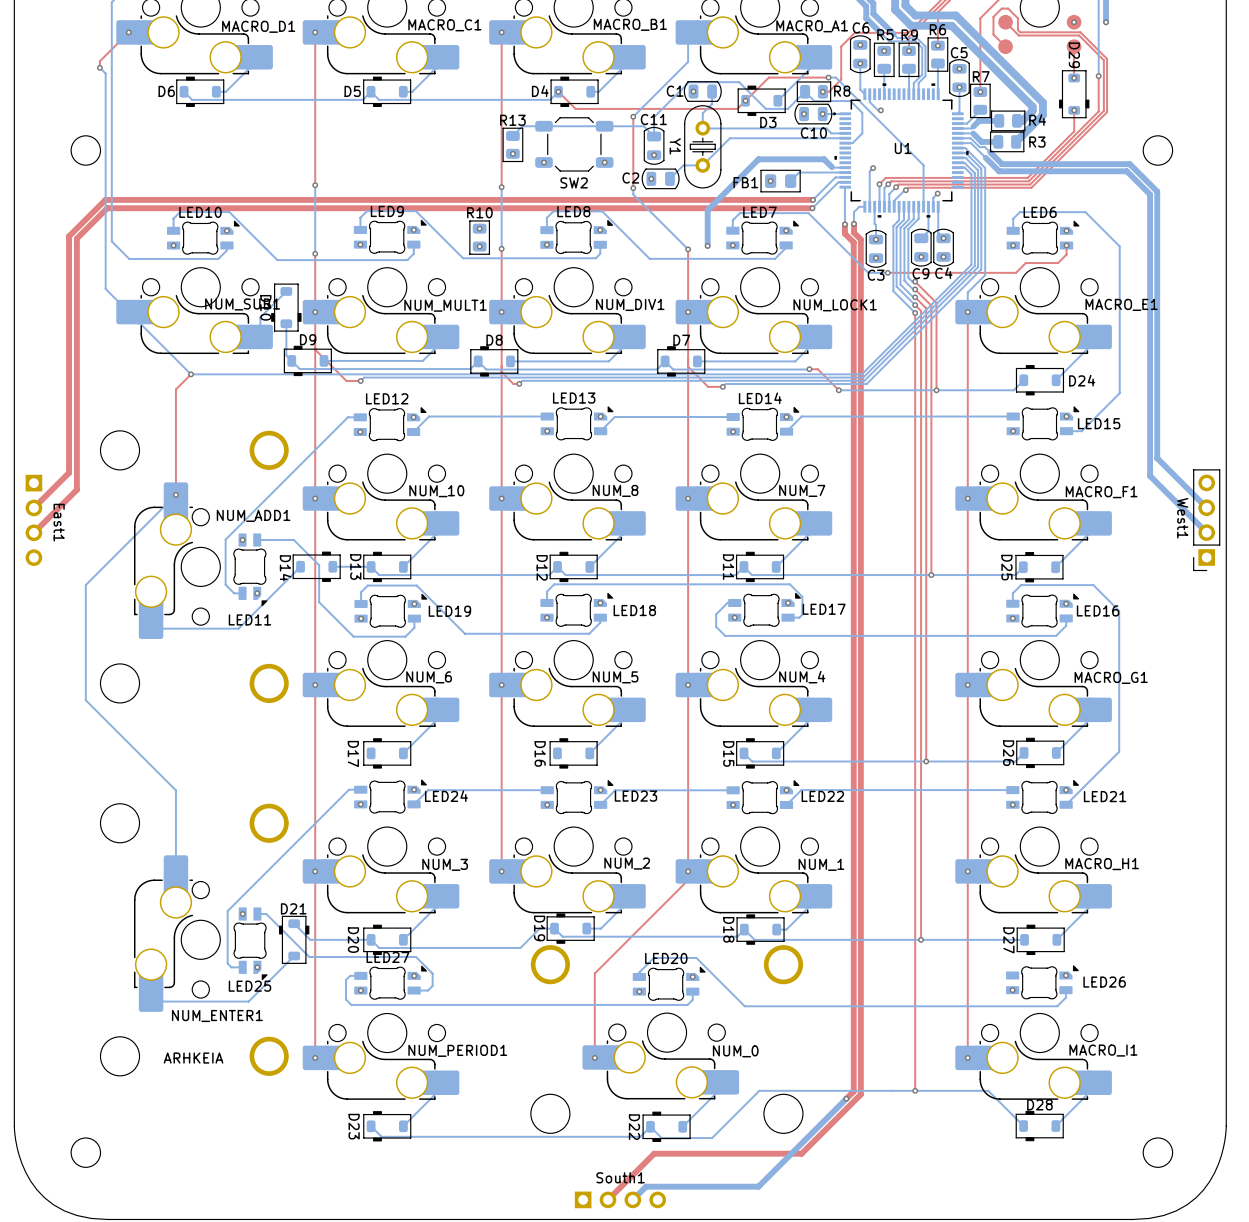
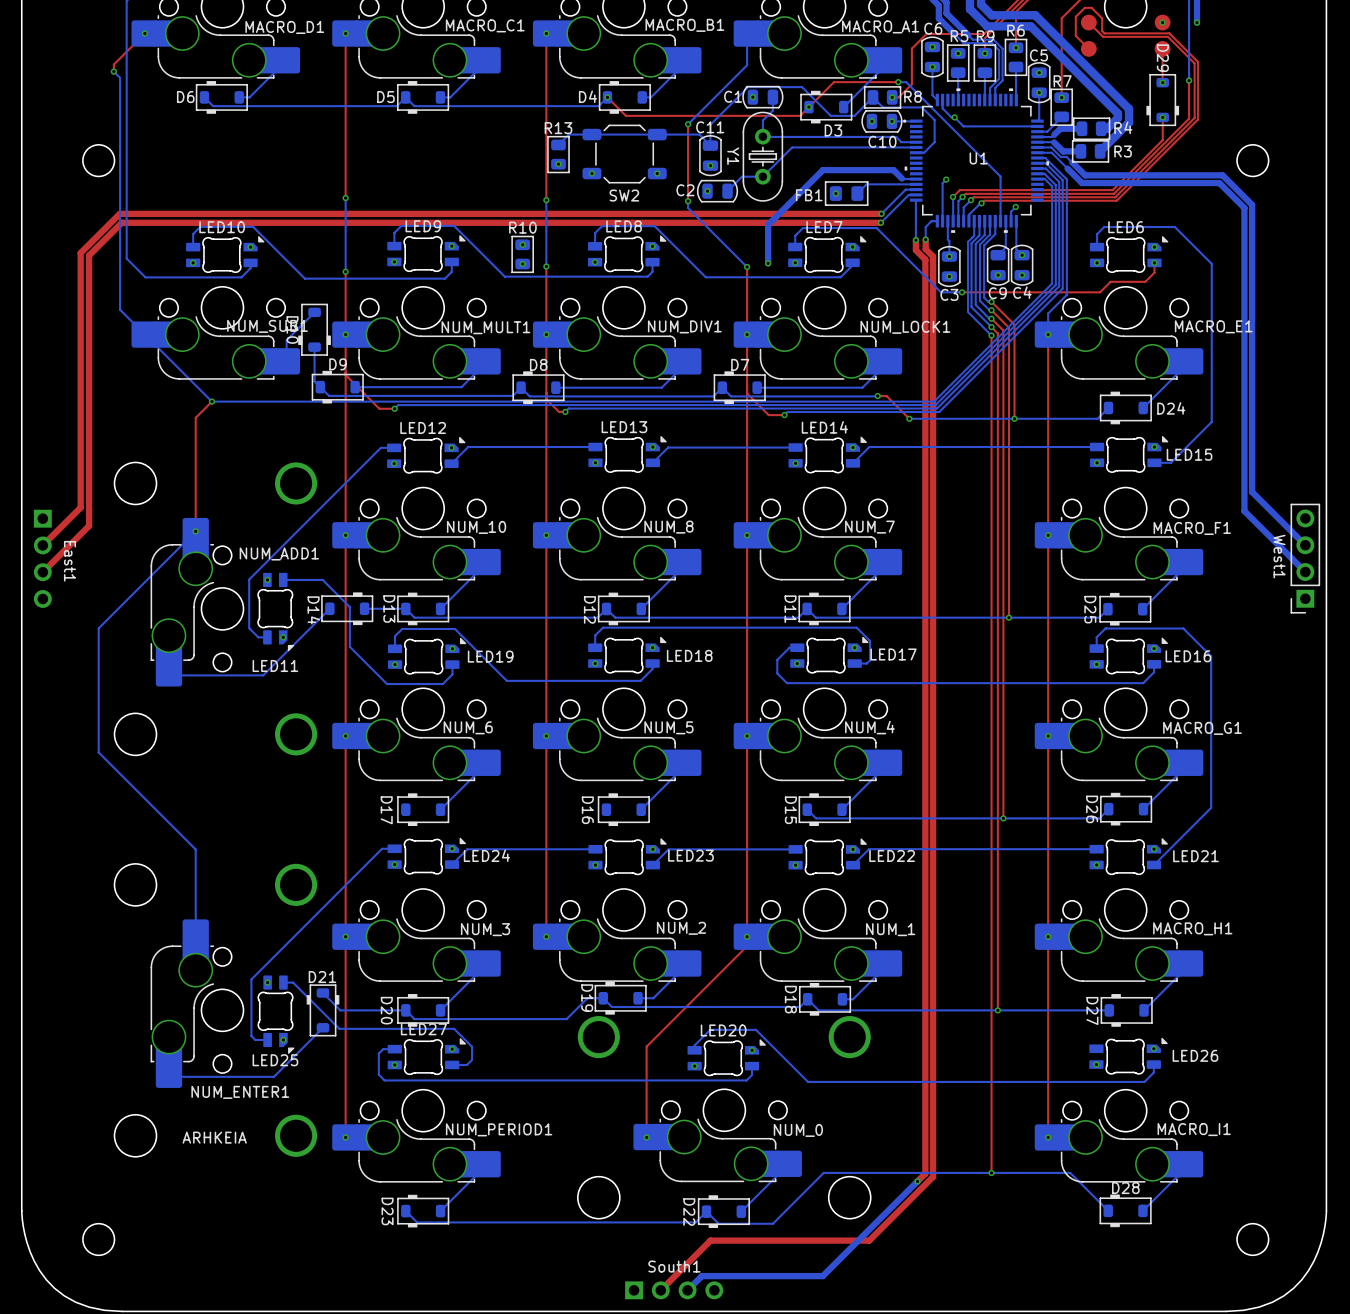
bottom track: none -> (954, 117) (963, 126) (1037, 126)

